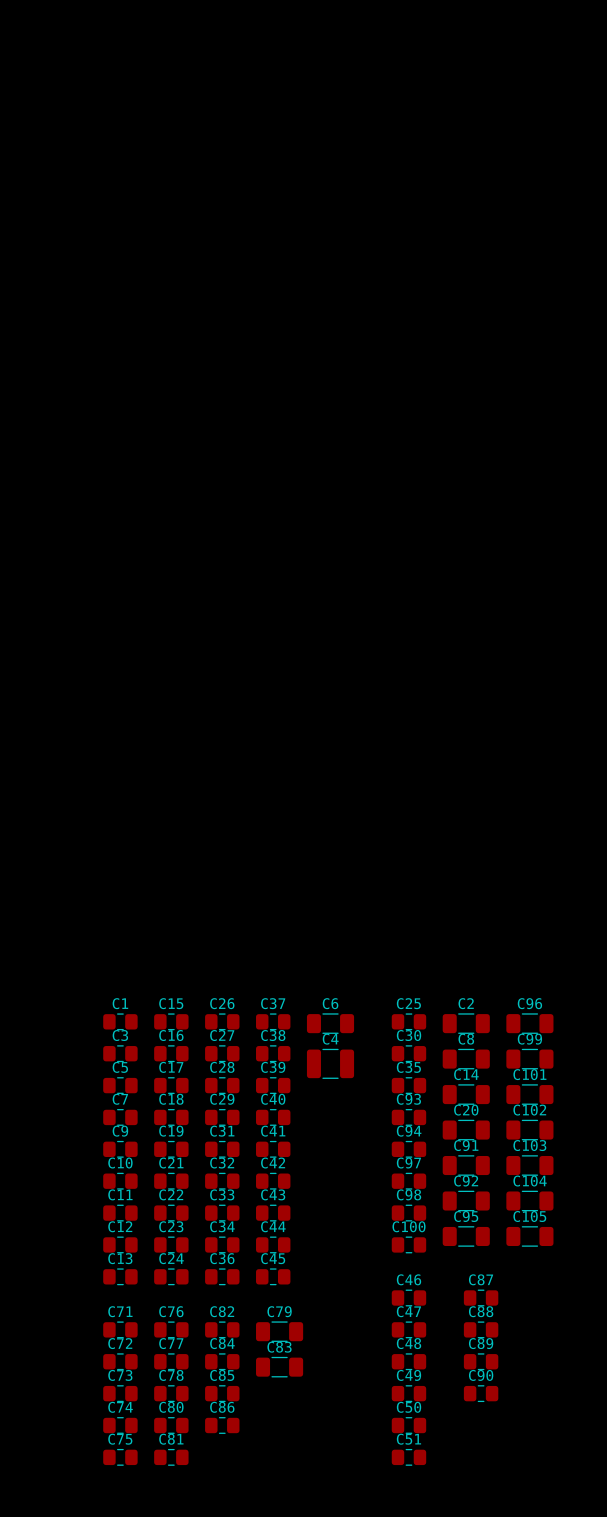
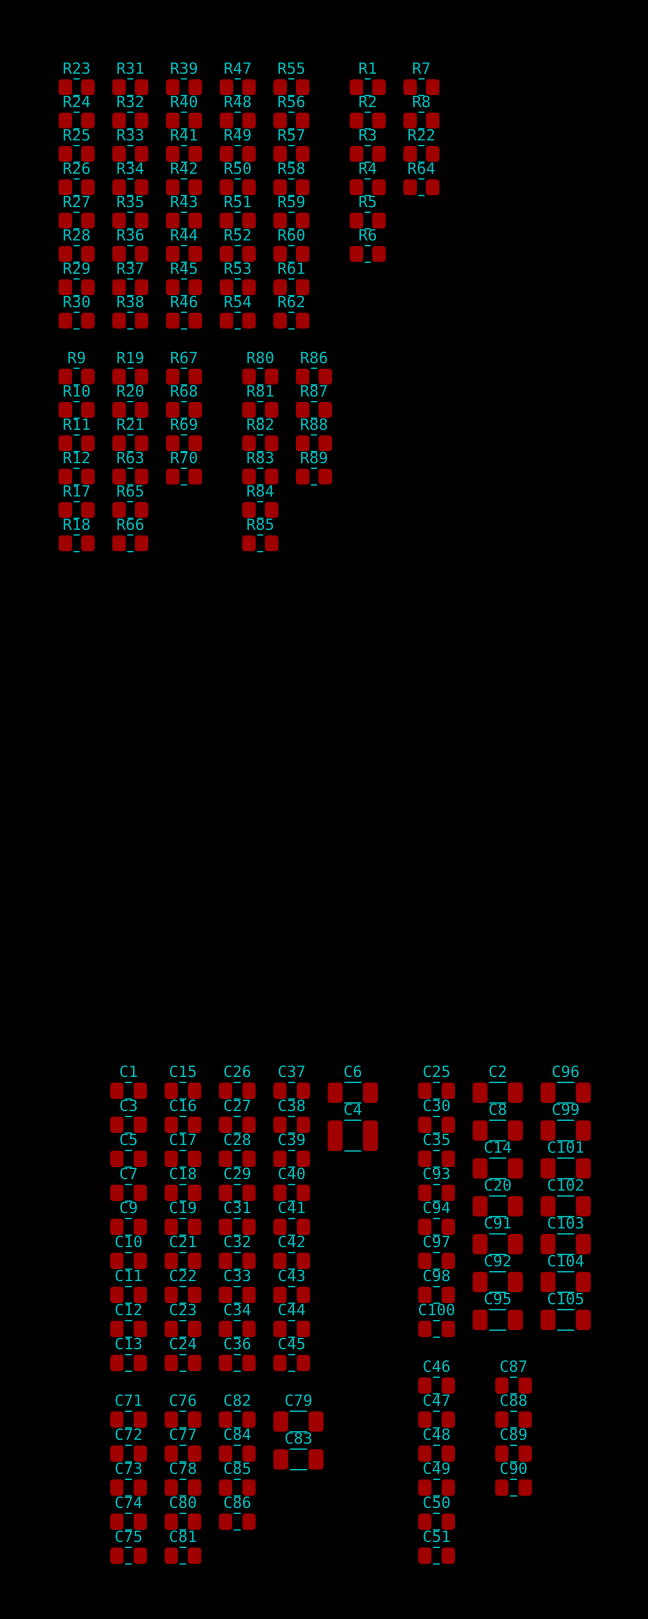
R23: none -> (76, 87)
R31: none -> (130, 87)
R39: none -> (184, 87)
R47: none -> (237, 87)
R55: none -> (291, 87)
R1: none -> (367, 87)
R7: none -> (421, 87)
R24: none -> (76, 120)
R32: none -> (130, 120)
R40: none -> (184, 120)
R48: none -> (237, 120)
R56: none -> (291, 120)
R2: none -> (367, 120)
R8: none -> (421, 120)
R25: none -> (76, 153)
R33: none -> (130, 153)
R41: none -> (184, 153)
R49: none -> (237, 153)
R57: none -> (291, 153)
R3: none -> (367, 153)
R22: none -> (421, 153)
R26: none -> (76, 187)
R34: none -> (130, 187)
R42: none -> (184, 187)
R50: none -> (237, 187)
R58: none -> (291, 187)
R4: none -> (367, 187)
R64: none -> (421, 187)
R27: none -> (76, 220)
R35: none -> (130, 220)
R43: none -> (184, 220)
R51: none -> (237, 220)
R59: none -> (291, 220)
R5: none -> (367, 220)
R28: none -> (76, 253)
R36: none -> (130, 253)
R44: none -> (184, 253)
R52: none -> (237, 253)
R60: none -> (291, 253)
R6: none -> (367, 253)
R29: none -> (76, 287)
R37: none -> (130, 287)
R45: none -> (184, 287)
R53: none -> (237, 287)
R61: none -> (291, 287)
R30: none -> (76, 320)
R38: none -> (130, 320)
R46: none -> (184, 320)
R54: none -> (237, 320)
R62: none -> (291, 320)
R9: none -> (76, 376)
R19: none -> (130, 376)
R67: none -> (184, 376)
R80: none -> (260, 376)
R86: none -> (314, 376)
R10: none -> (76, 409)
R20: none -> (130, 409)
R68: none -> (184, 409)
R81: none -> (260, 409)
R87: none -> (314, 409)
R11: none -> (76, 443)
R21: none -> (130, 443)
R69: none -> (184, 443)
R82: none -> (260, 443)
R88: none -> (314, 443)
R12: none -> (76, 476)
R63: none -> (130, 476)
R70: none -> (184, 476)
R83: none -> (260, 476)
R89: none -> (314, 476)
R17: none -> (76, 509)
R65: none -> (130, 509)
R84: none -> (260, 509)
R18: none -> (76, 543)
R66: none -> (130, 543)
R85: none -> (260, 543)

